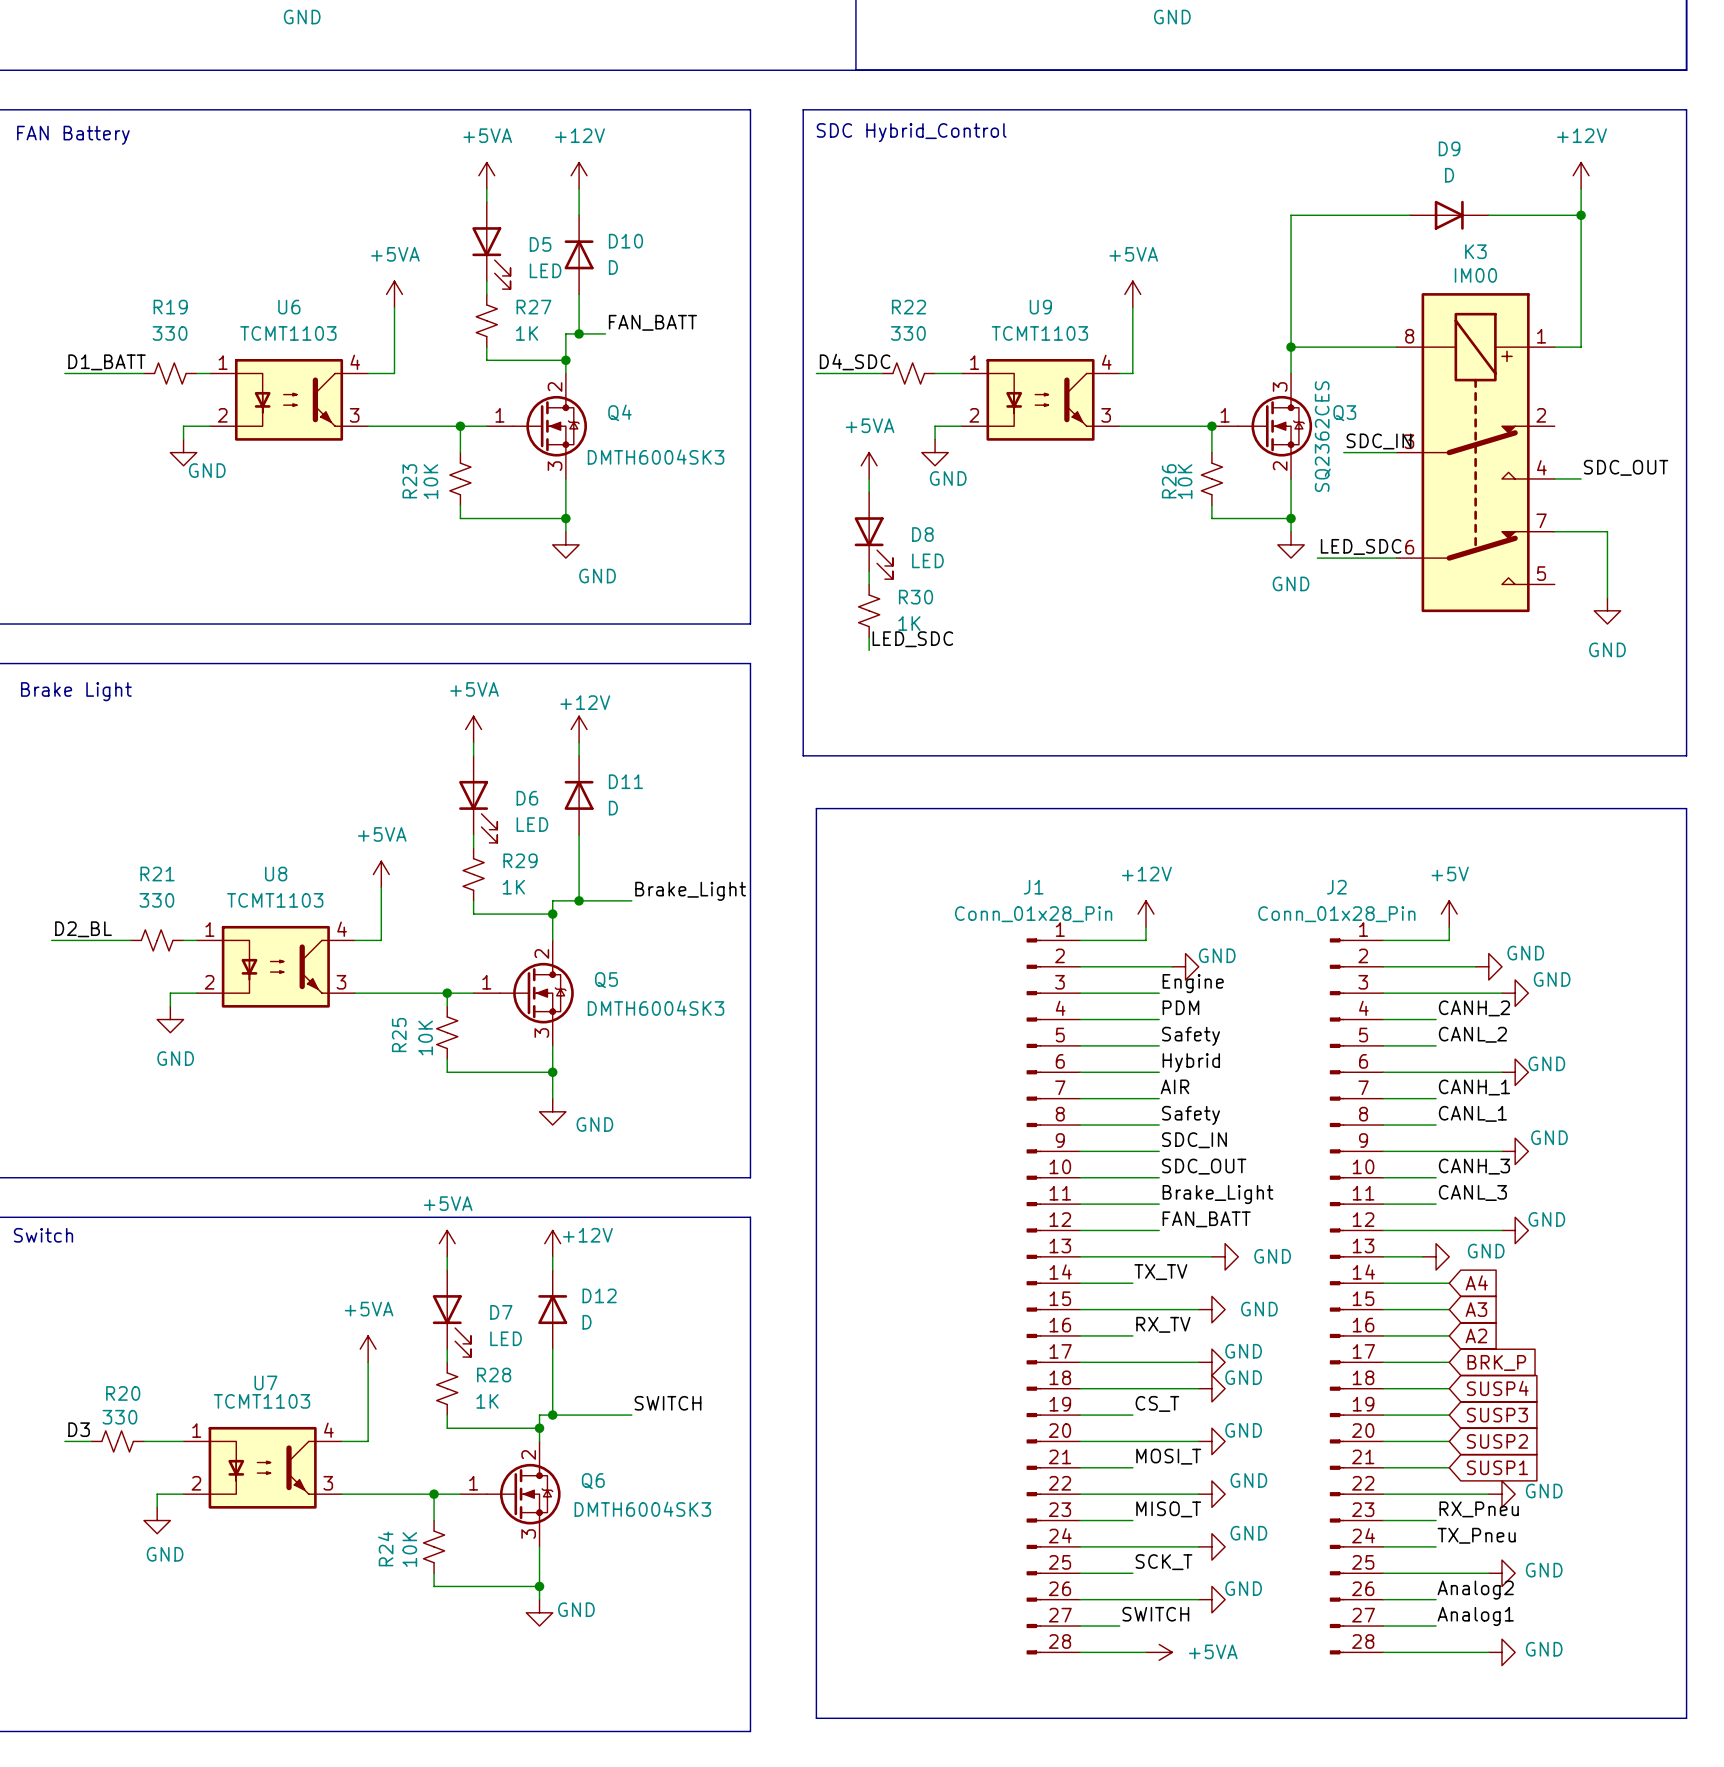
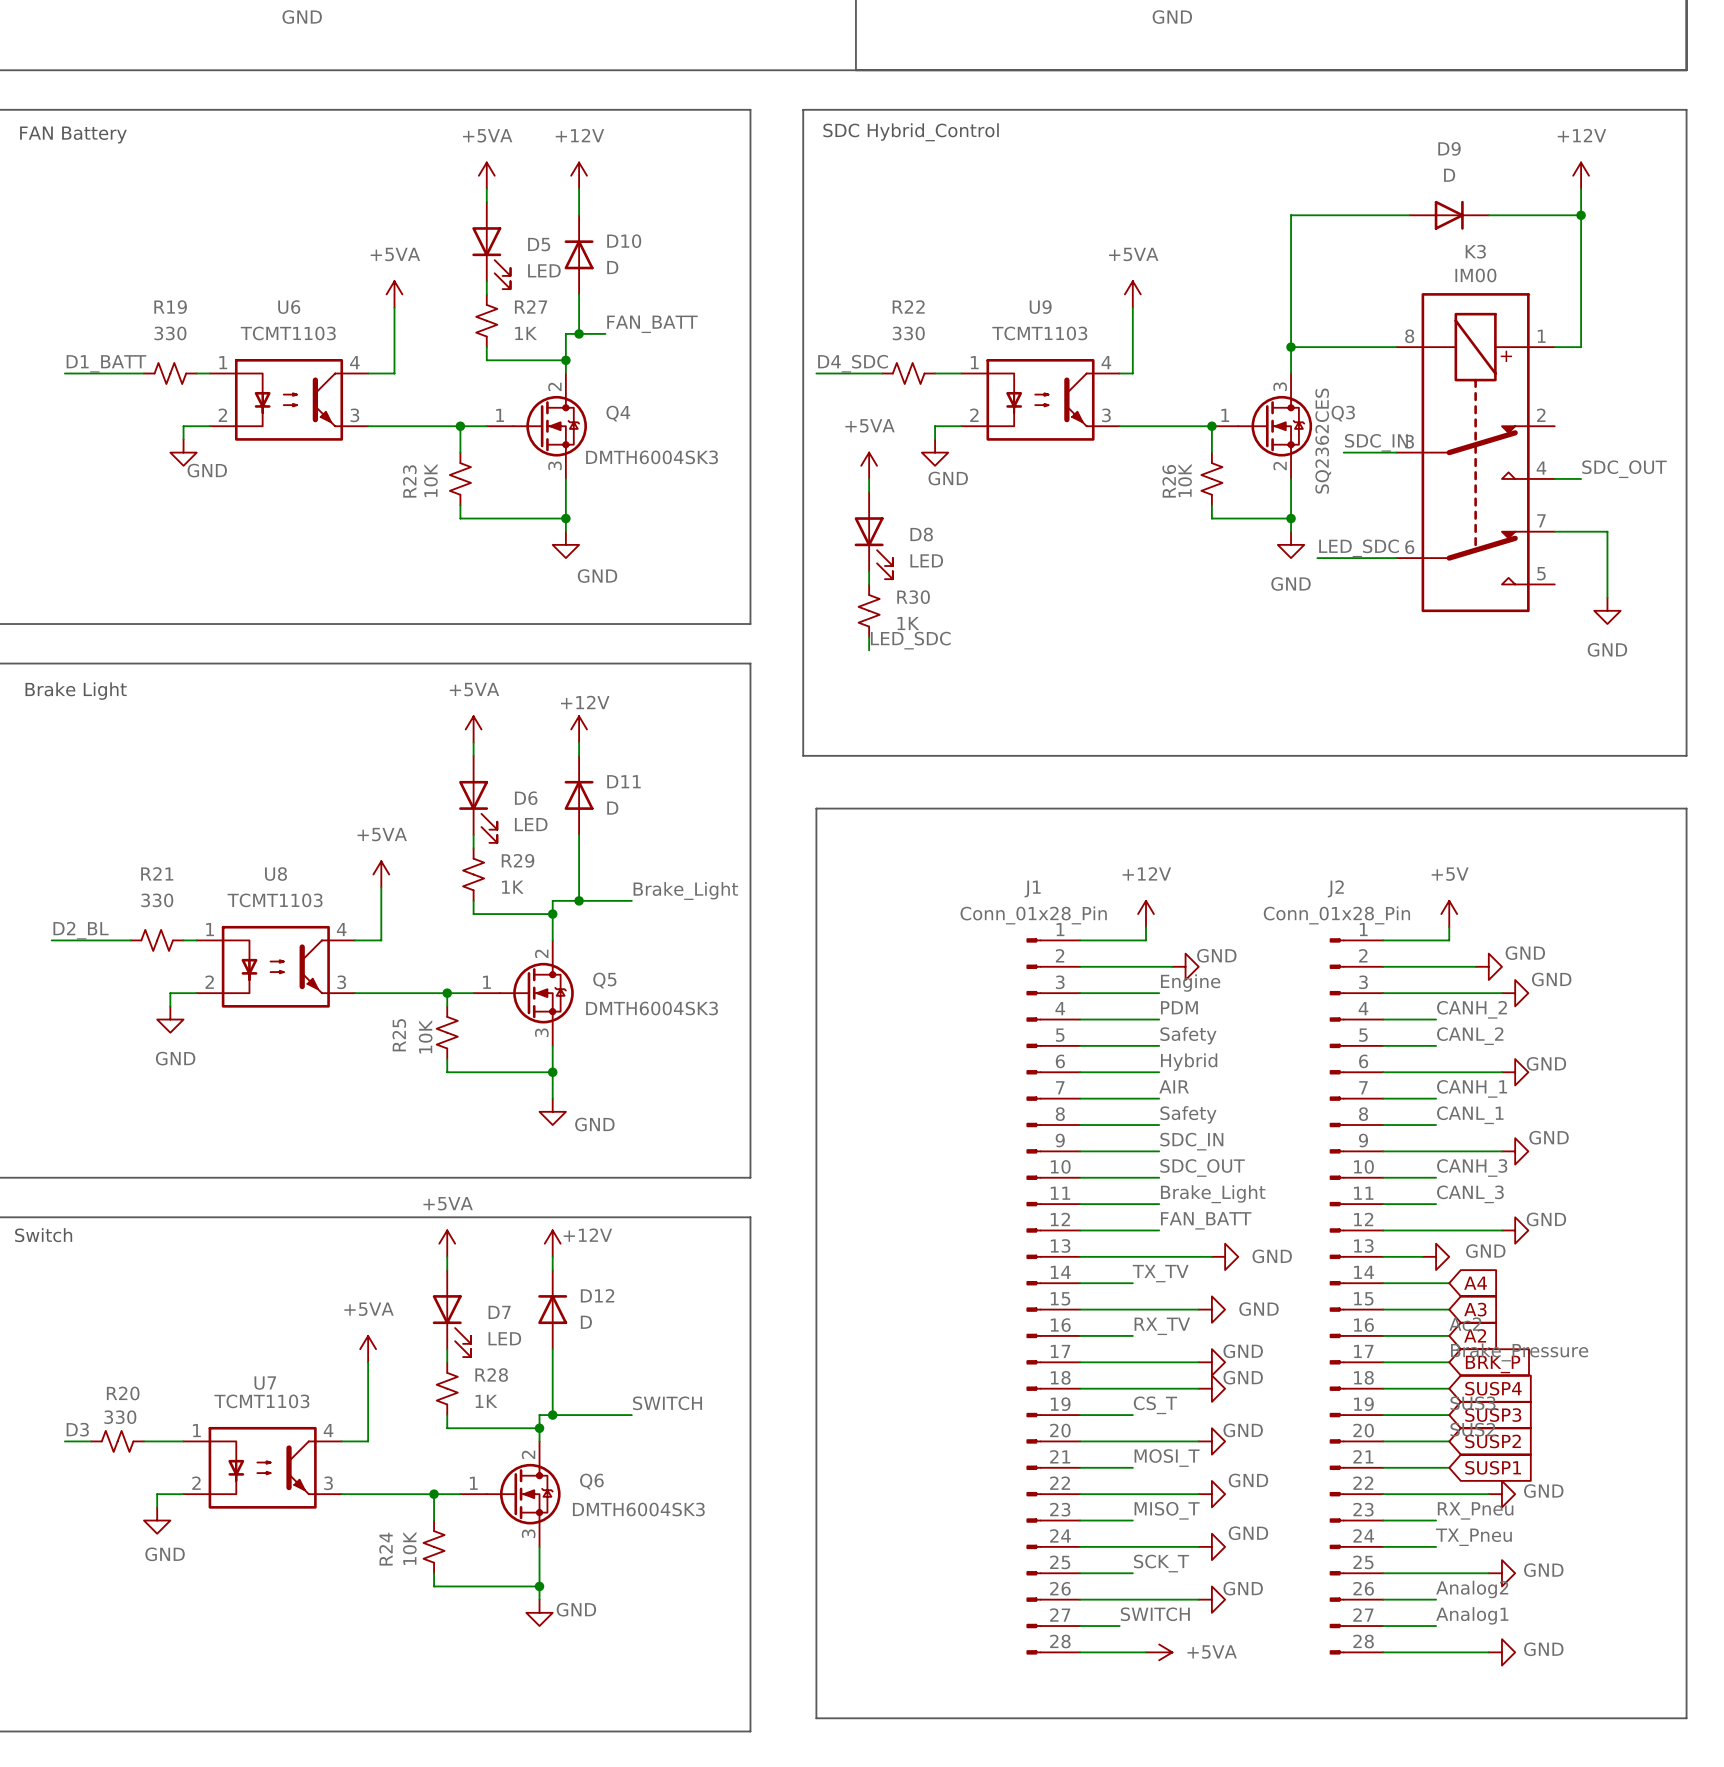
label: none -> Ac2 (1465, 1324)
label: none -> Brake_Pressure (1519, 1352)
label: none -> SUS3 (1472, 1403)
label: none -> SUS2 (1472, 1429)

